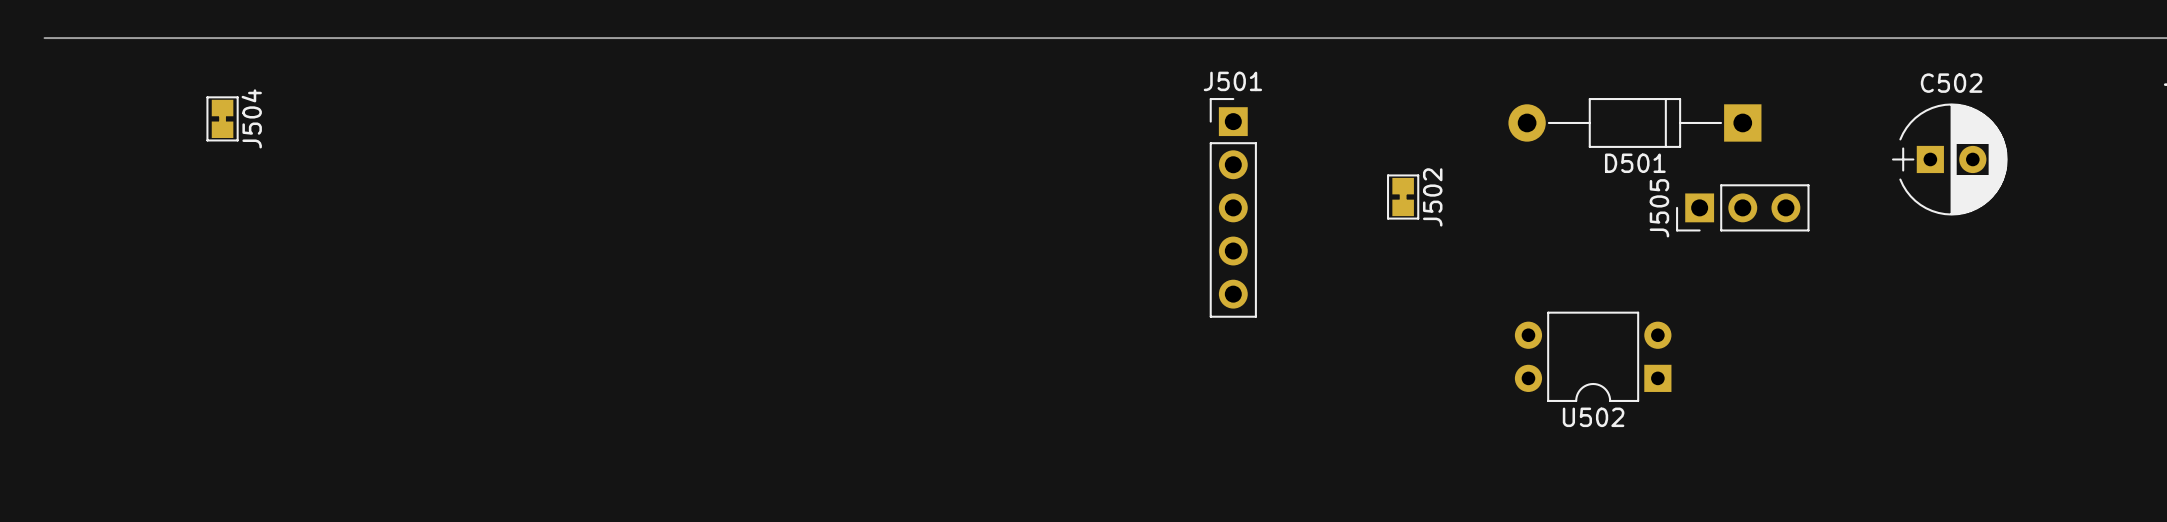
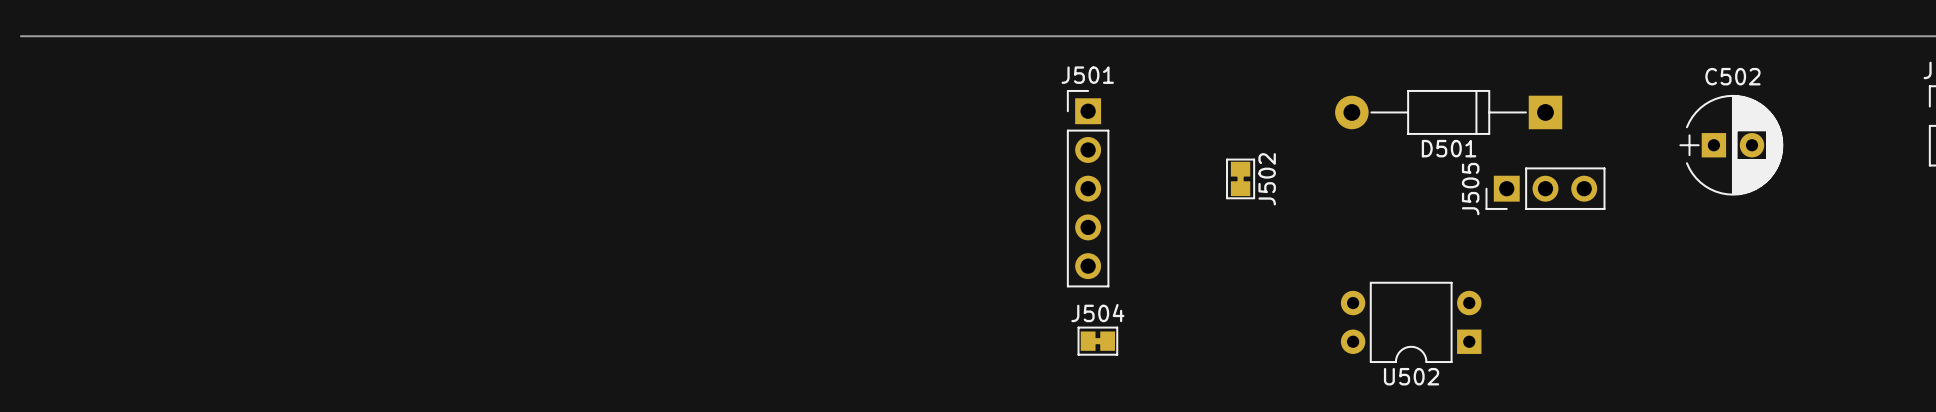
J504 rotation: 0° (222, 118) -> 90° clockwise (1097, 341)
J504 position: (222, 118) -> (1097, 341)
J504 name position: J504 (251, 118) -> J504 (1097, 313)

